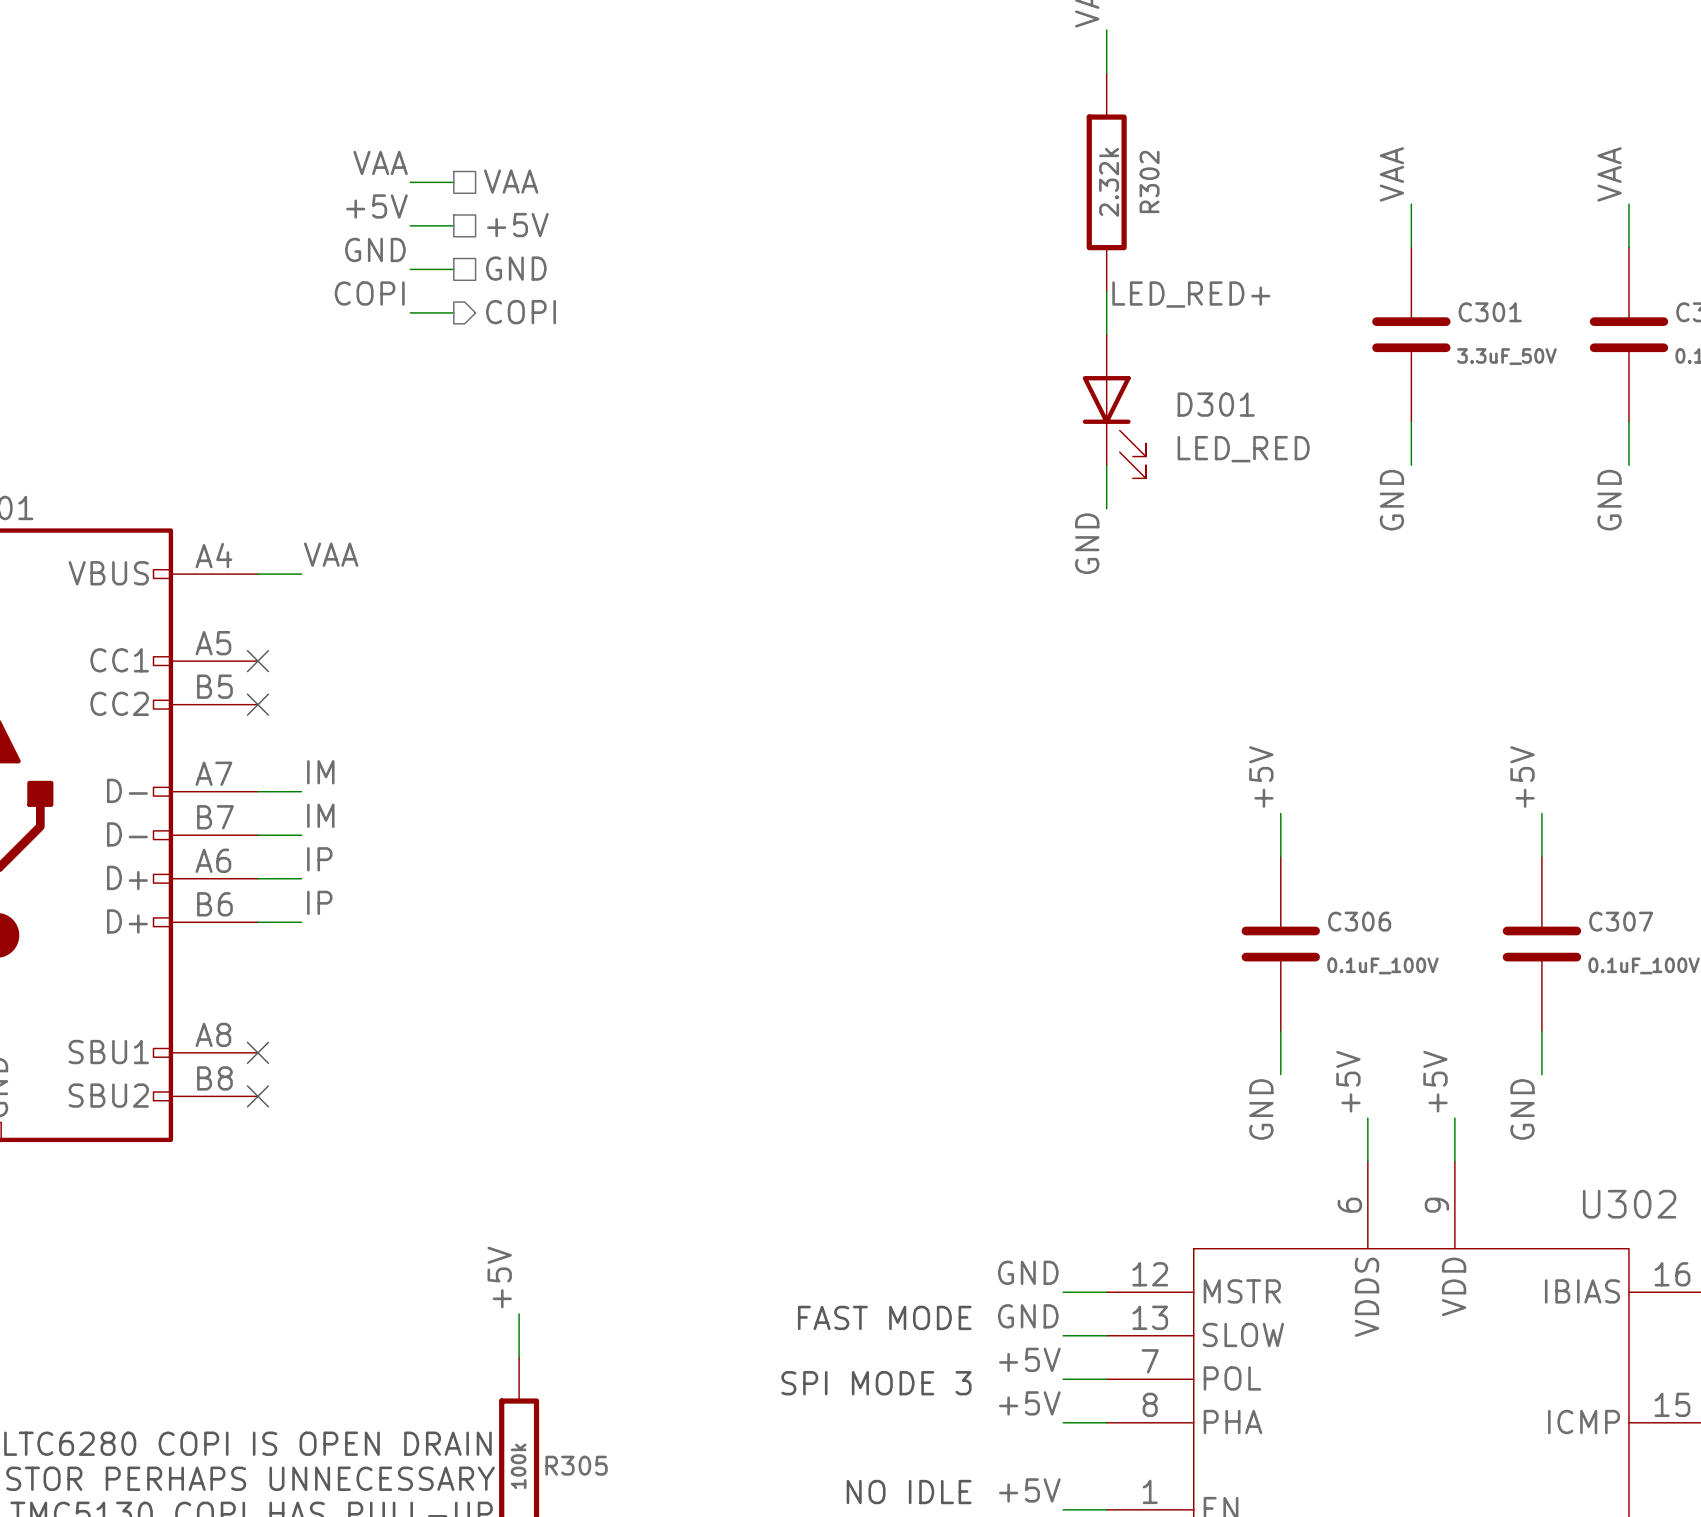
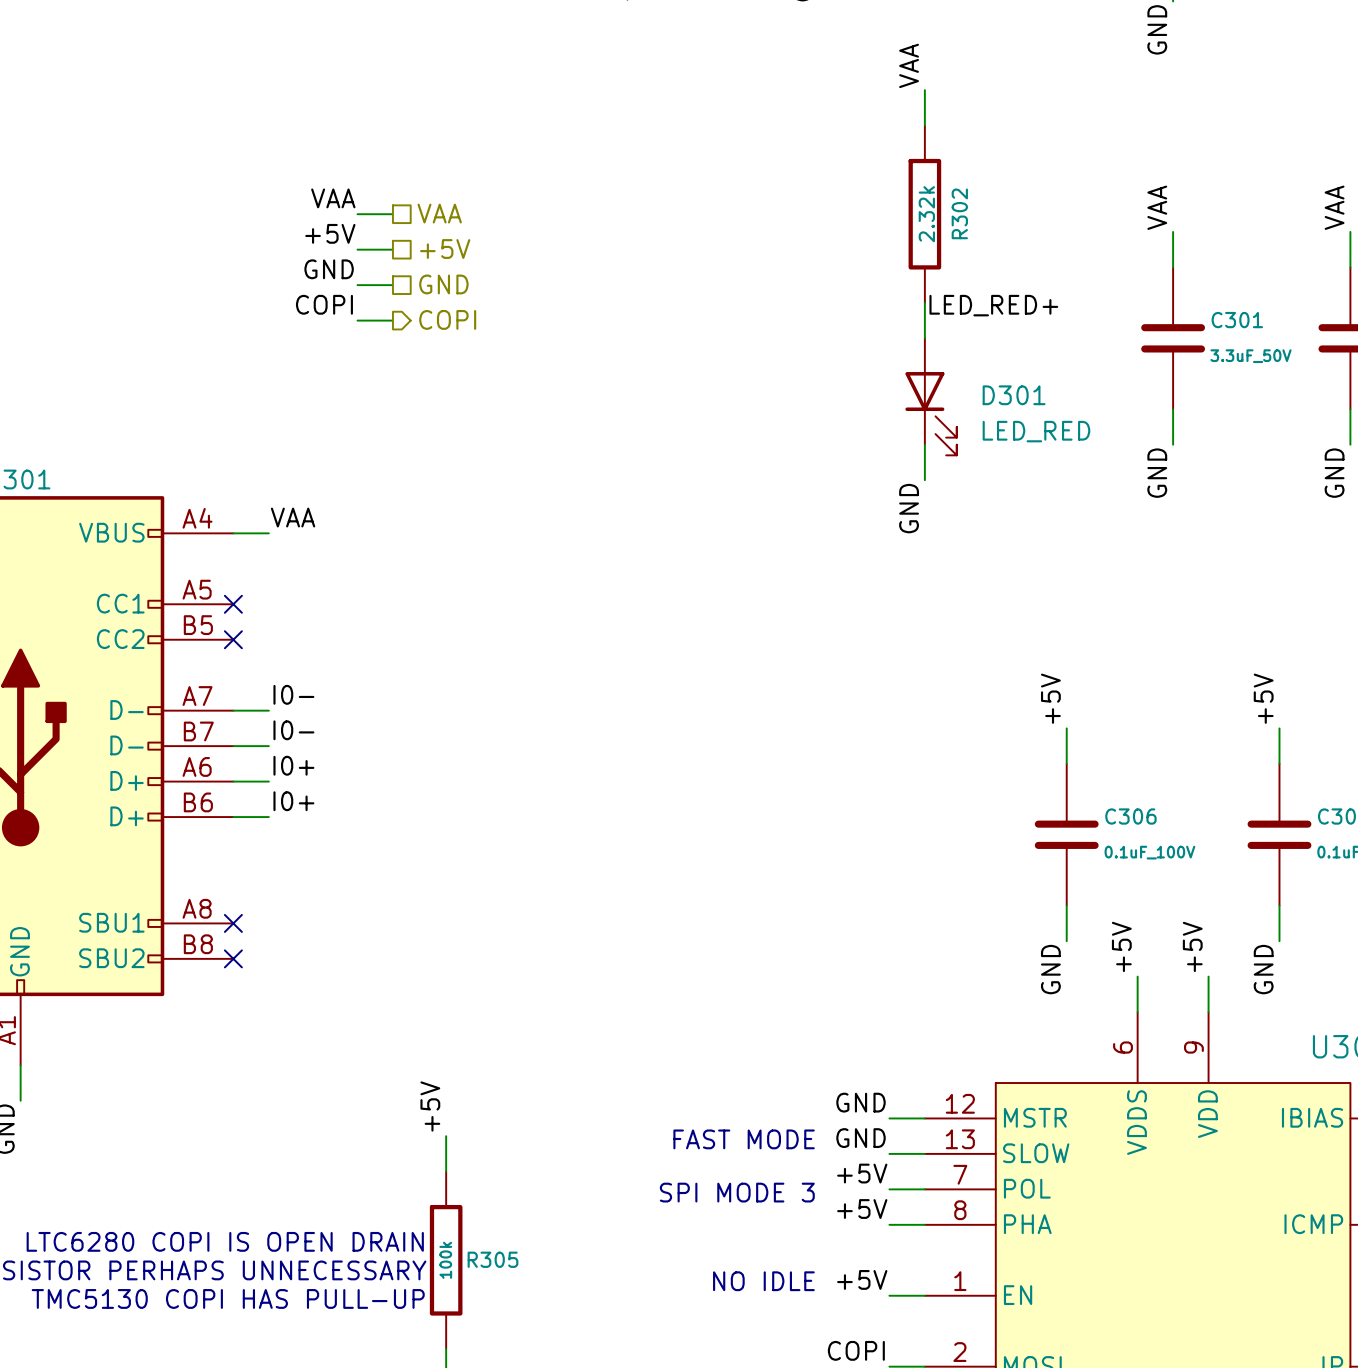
label: IM (320, 772) -> I0- (293, 694)
label: IM (320, 815) -> I0- (293, 730)
label: IP (319, 859) -> I0+ (293, 765)
label: IP (319, 902) -> I0+ (293, 801)

